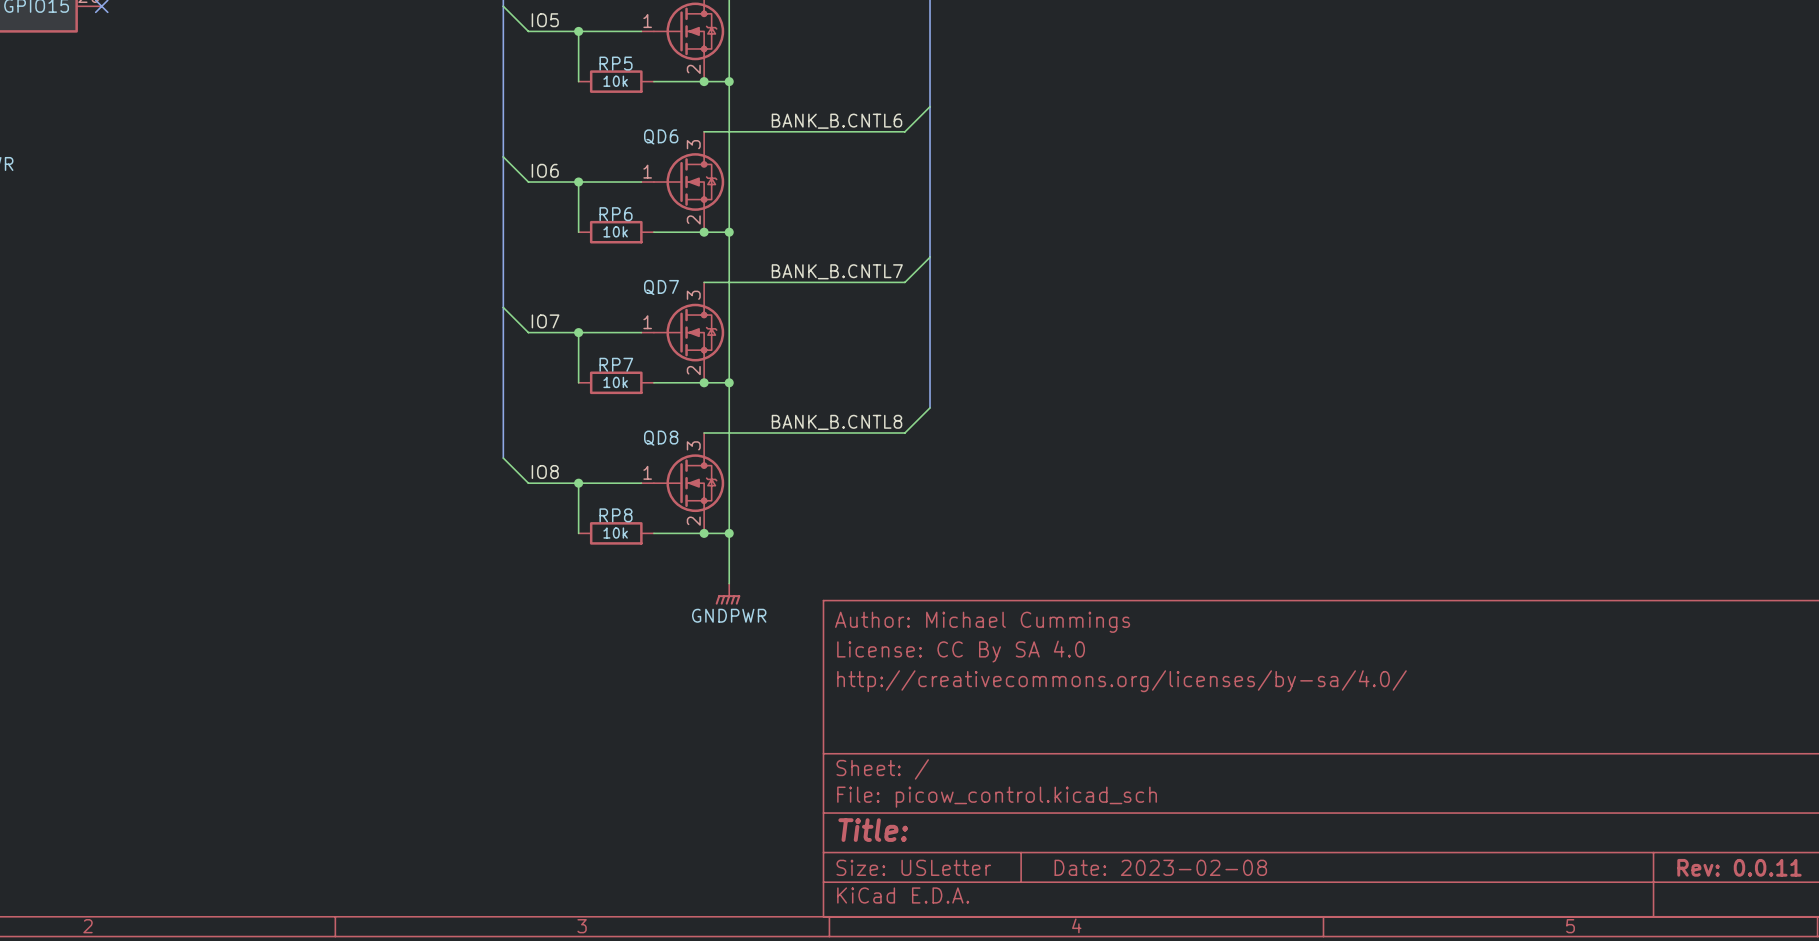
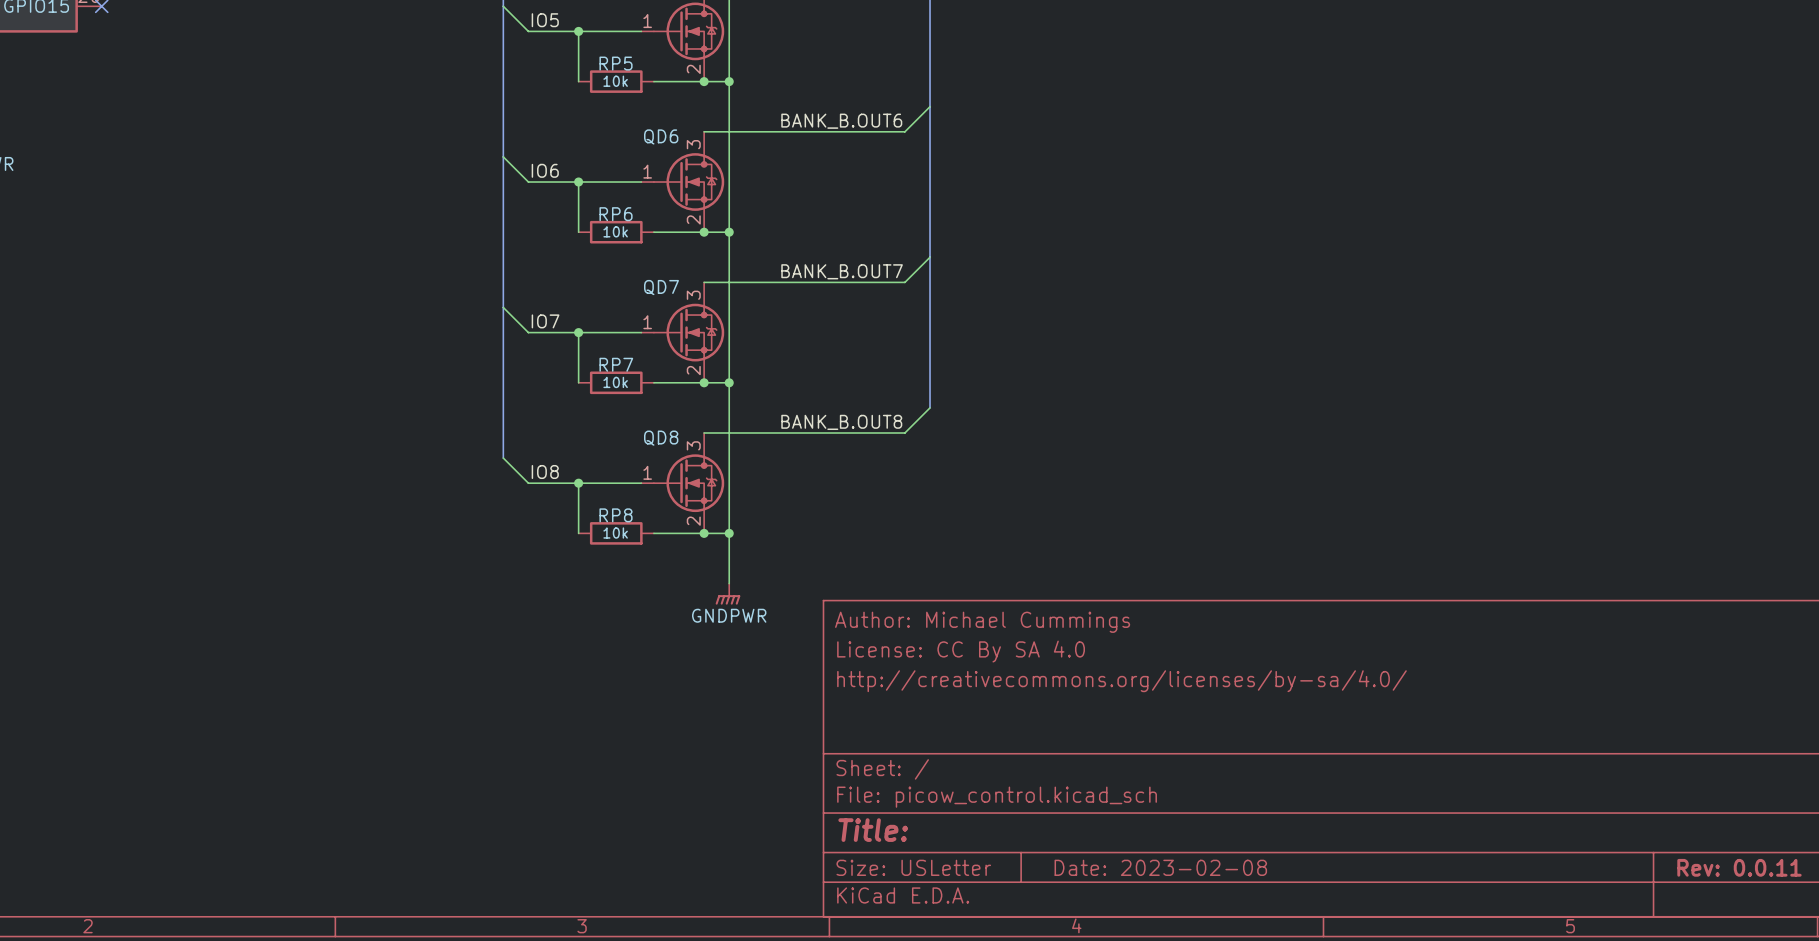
label: BANK_B.CNTL6 (836, 121) -> BANK_B.OUT6 (841, 121)
label: BANK_B.CNTL7 (837, 271) -> BANK_B.OUT7 (842, 271)
label: BANK_B.CNTL8 (836, 422) -> BANK_B.OUT8 (841, 422)

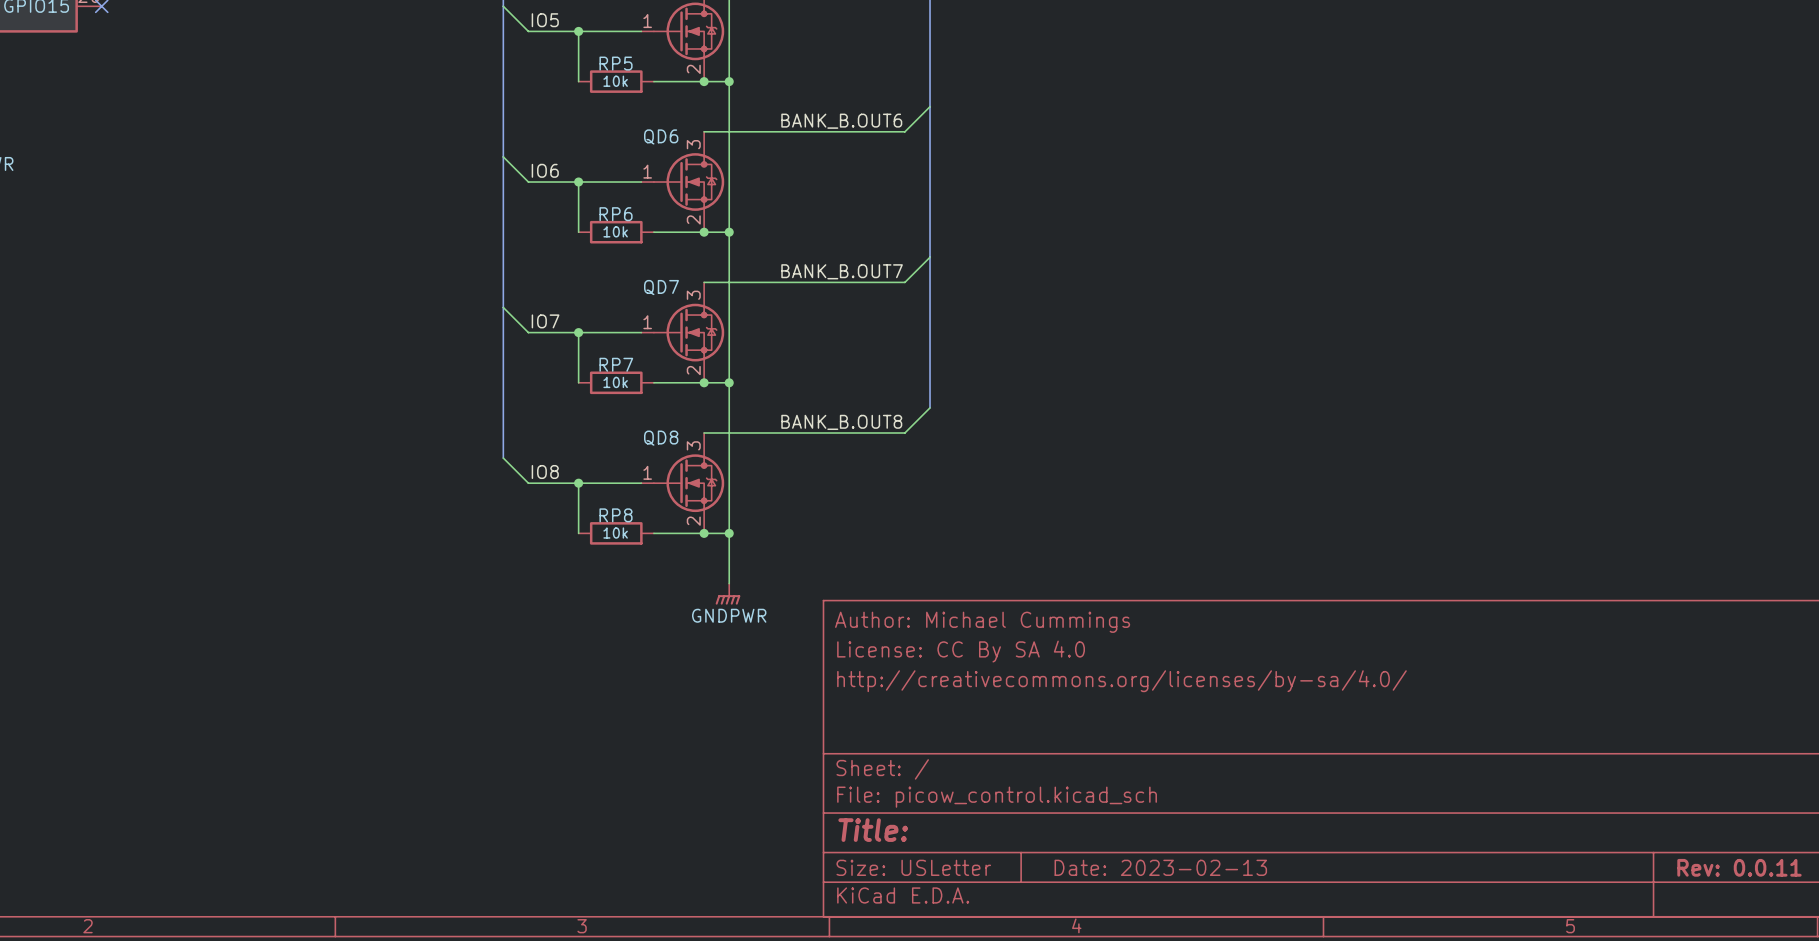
title block: Date: 2023-02-08 (1160, 867) -> Date: 2023-02-13 (1160, 867)

